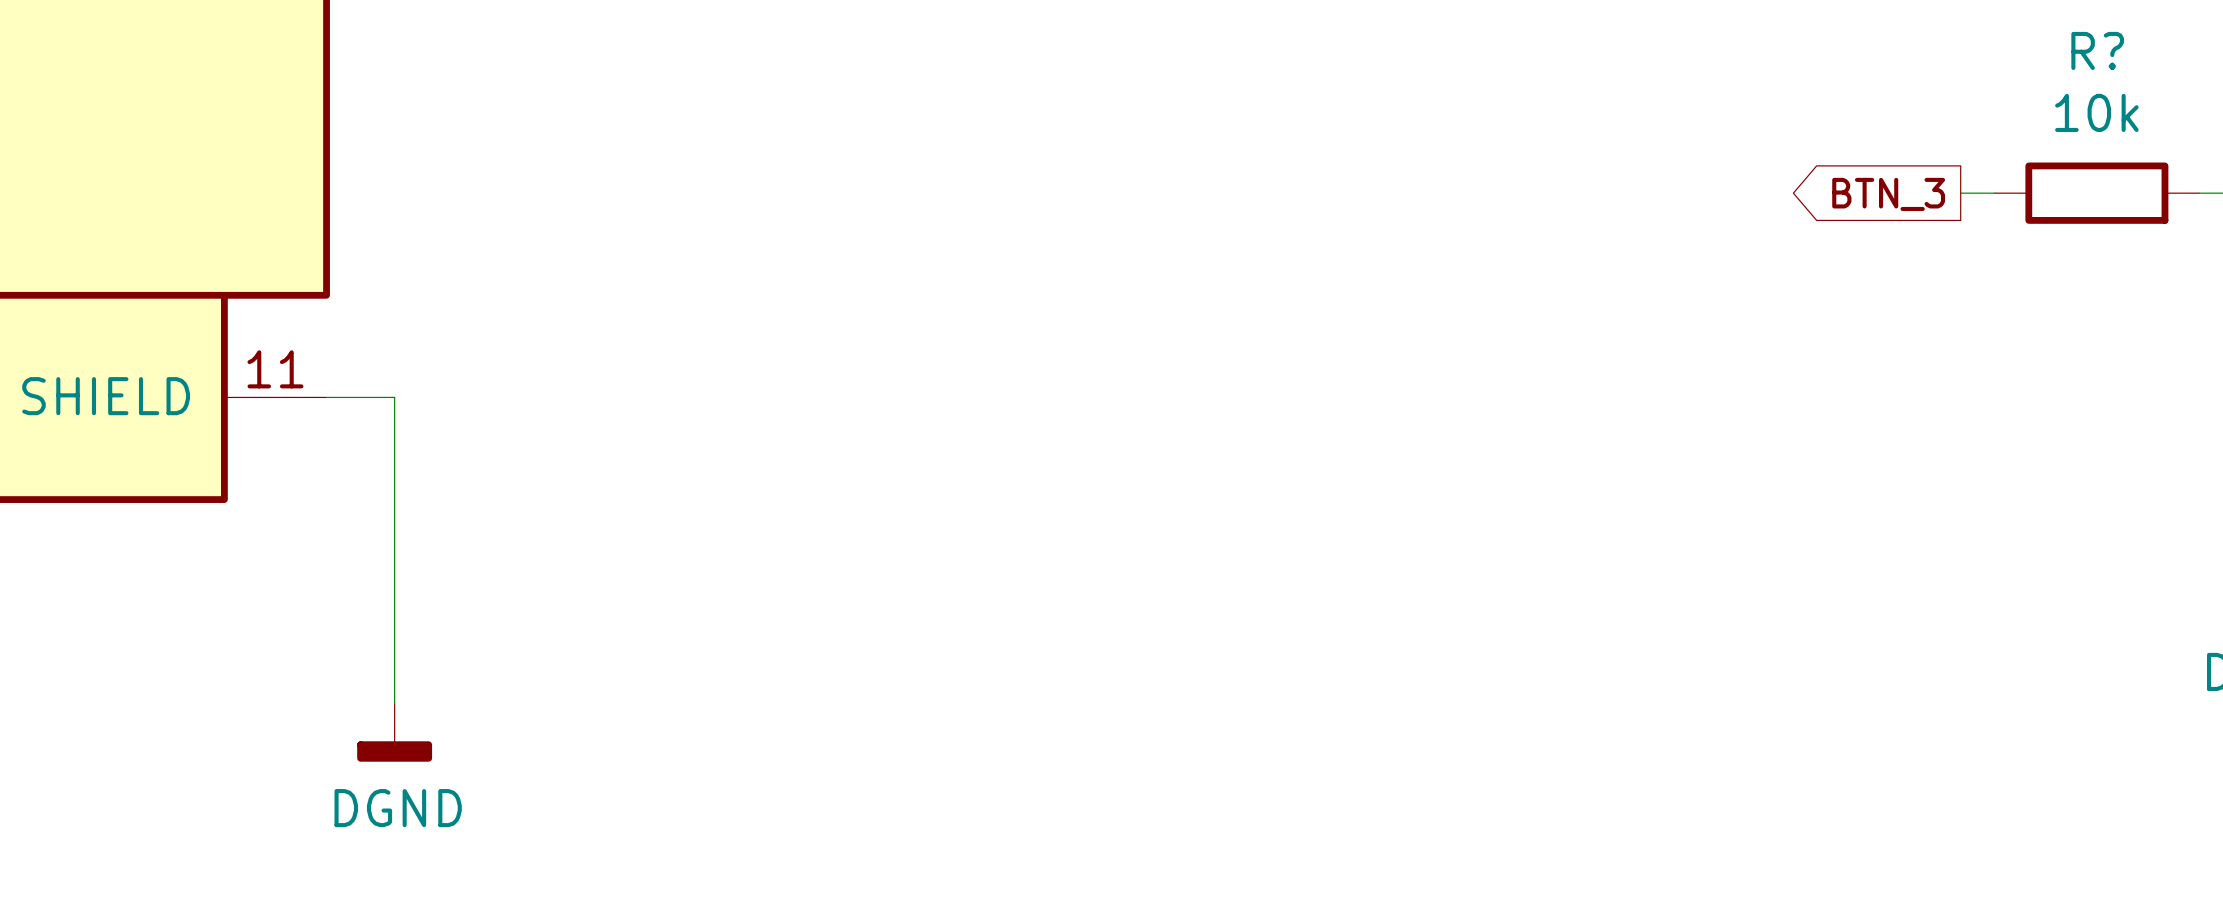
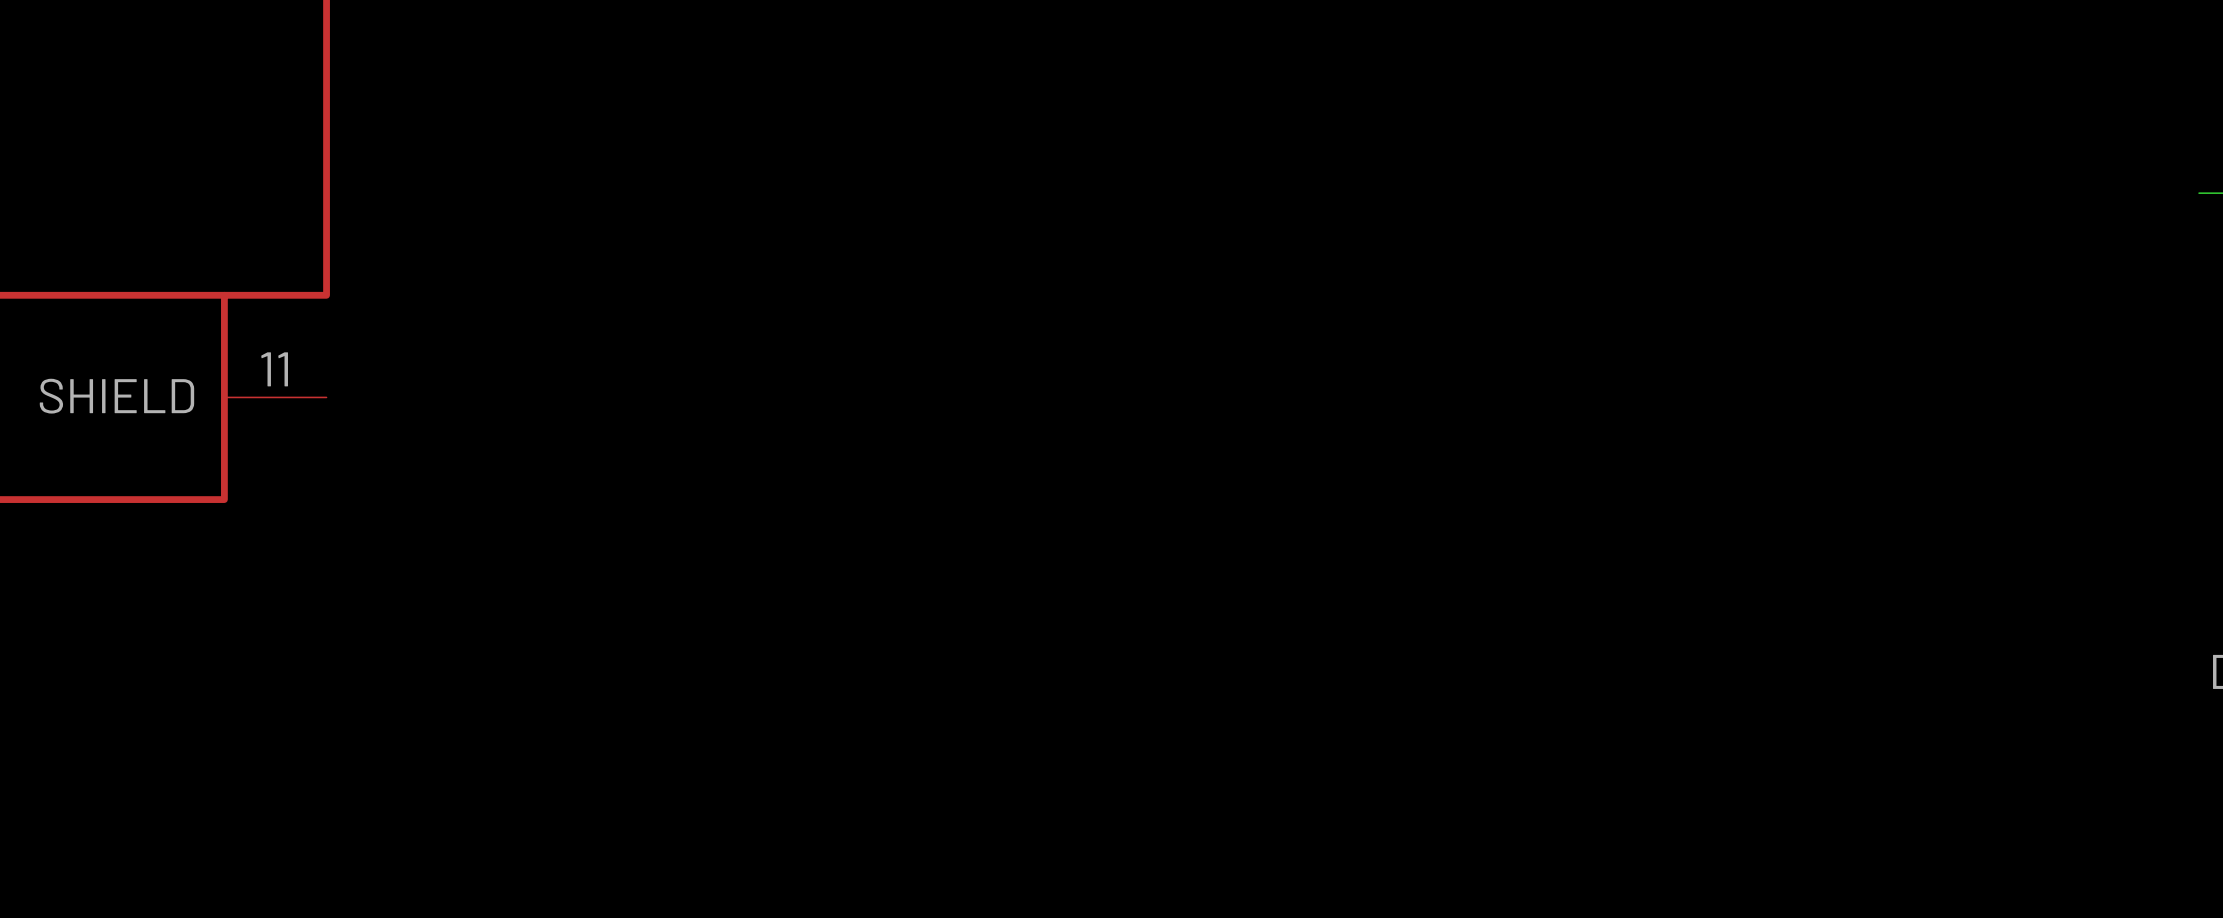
wire: (1960, 193) (1994, 193) -> none
R?: 10k (2096, 193) -> none
global label: BTN_3 (1888, 194) -> none
wire: (326, 397) (394, 397) (394, 703) -> none
power symbol: DGND (394, 732) -> none

